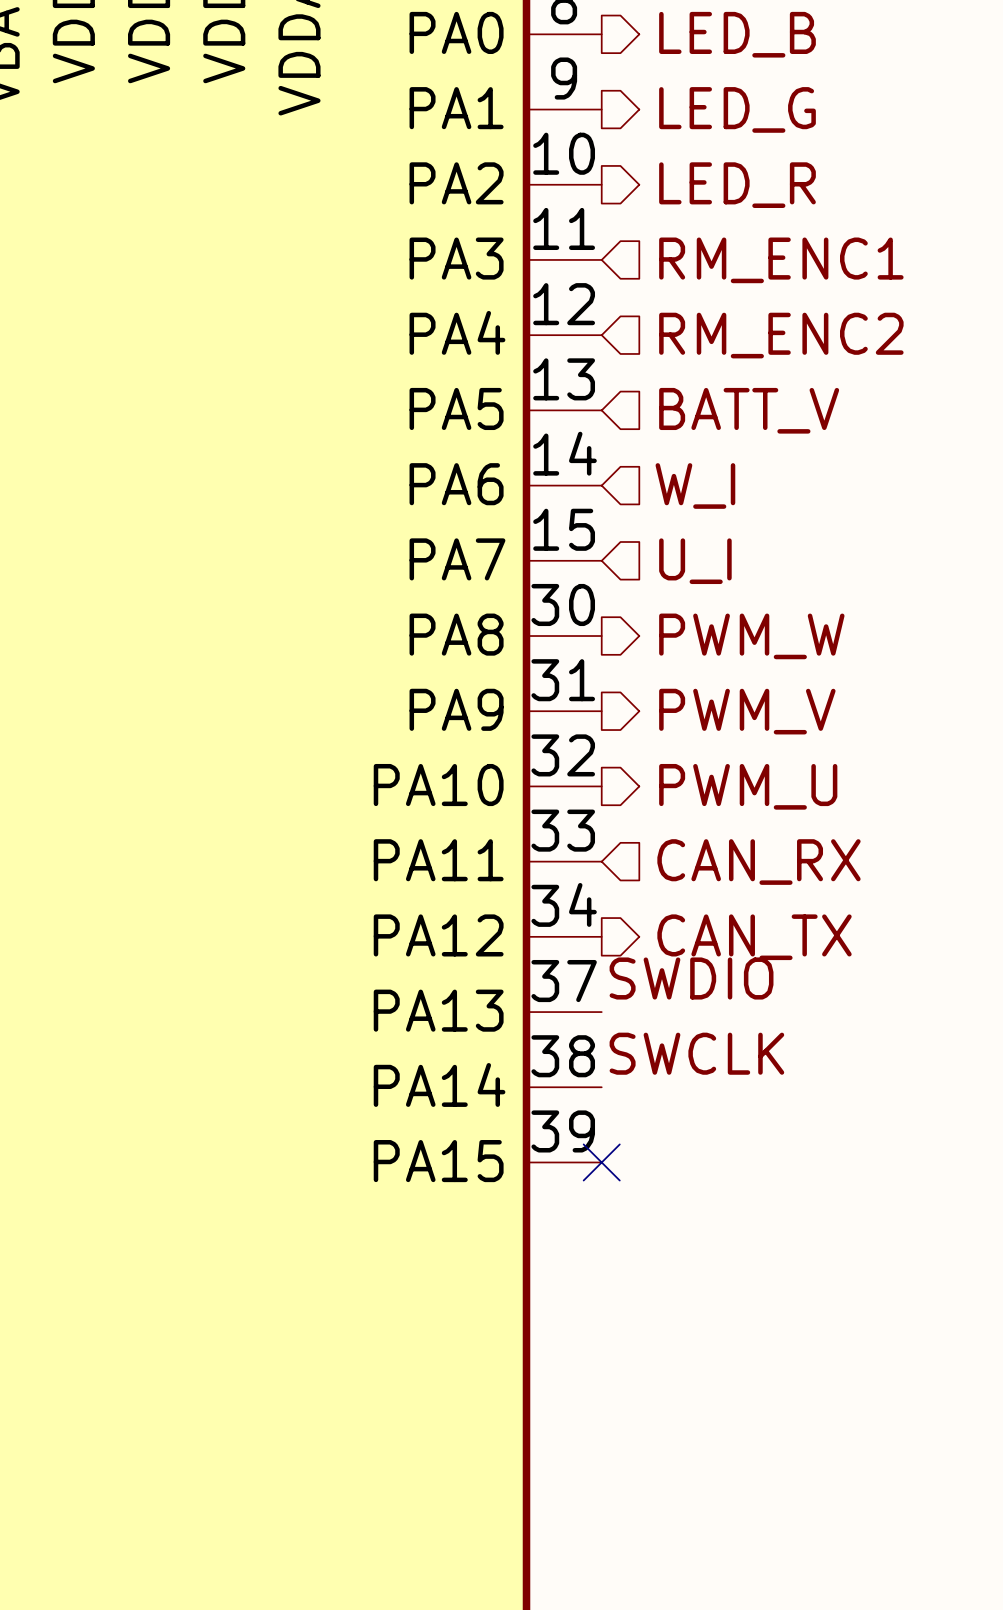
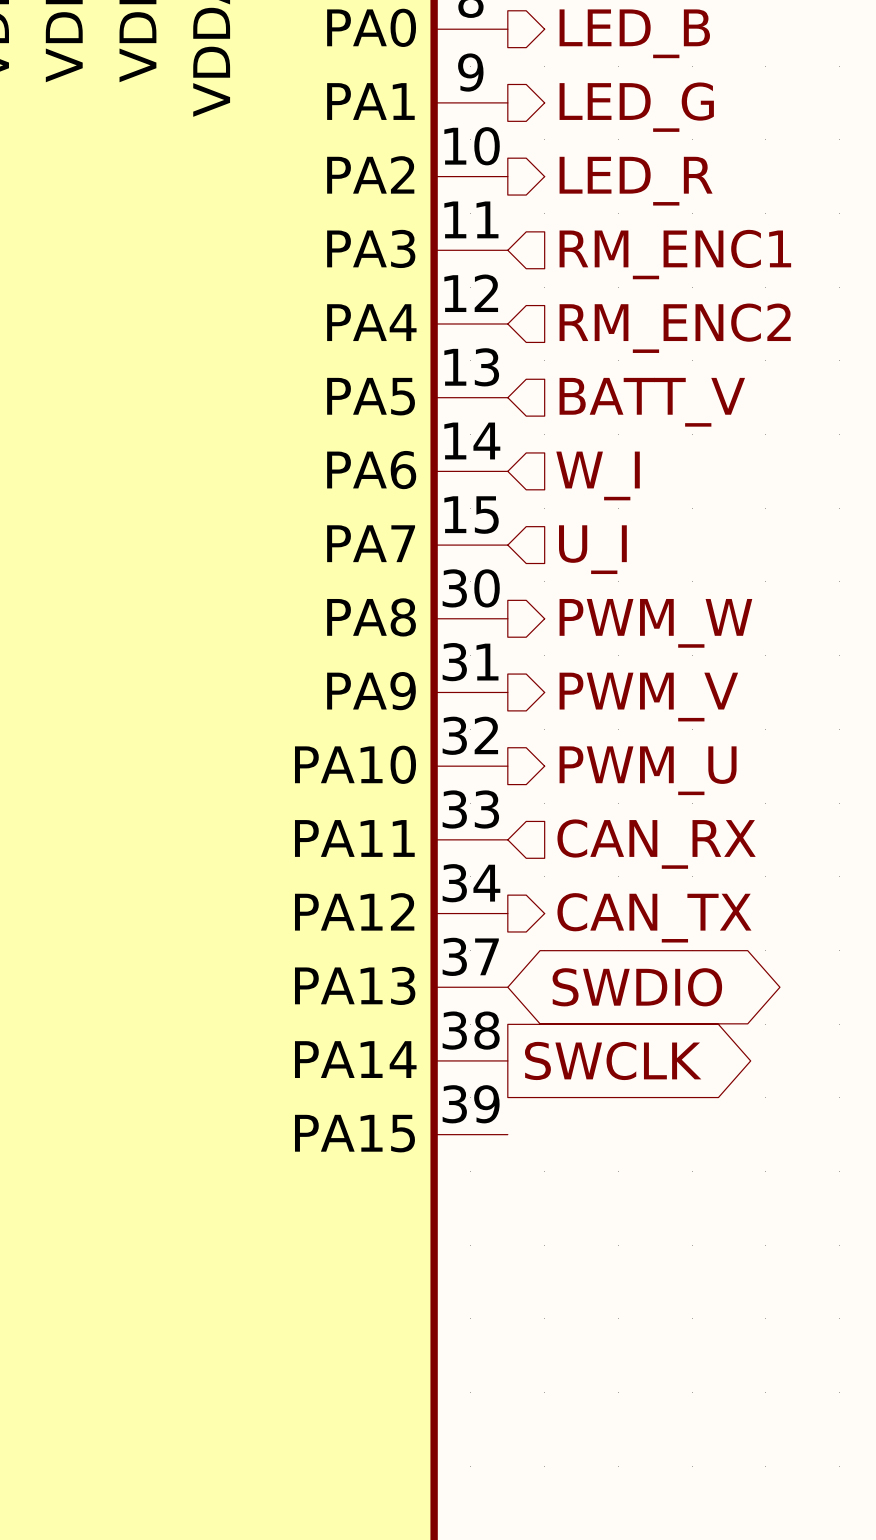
label: SWDIO (691, 978) -> none
global label: none -> SWDIO (637, 987)
label: SWCLK (696, 1053) -> none
global label: none -> SWCLK (613, 1060)
no-connect mark: (601, 1162) -> none

